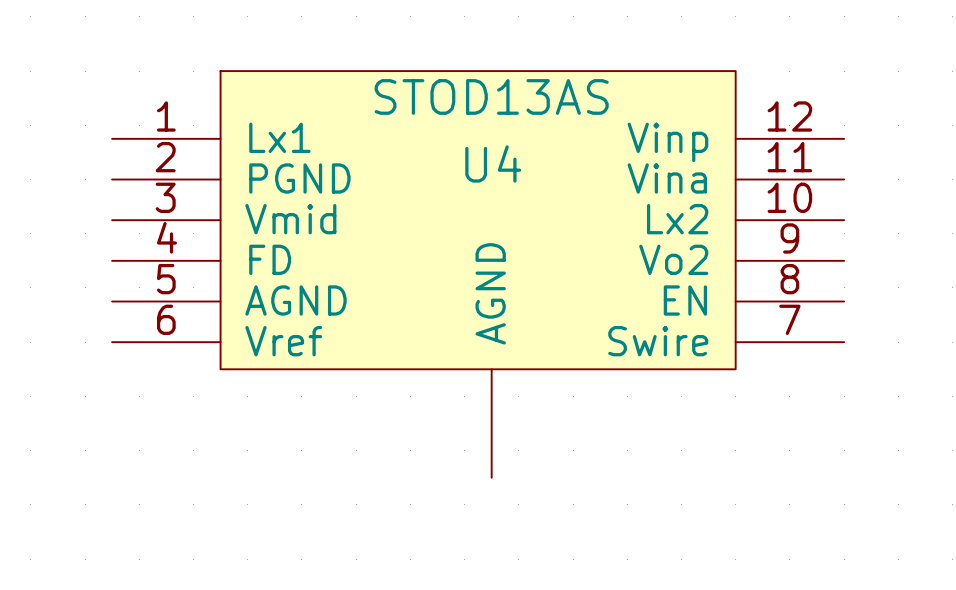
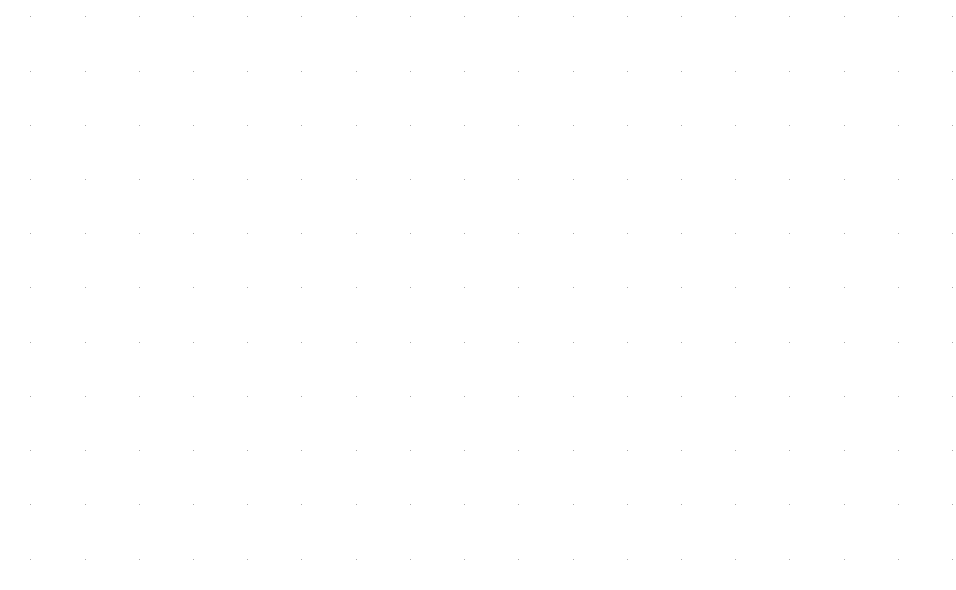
U4: STOD13AS (478, 274) -> none

